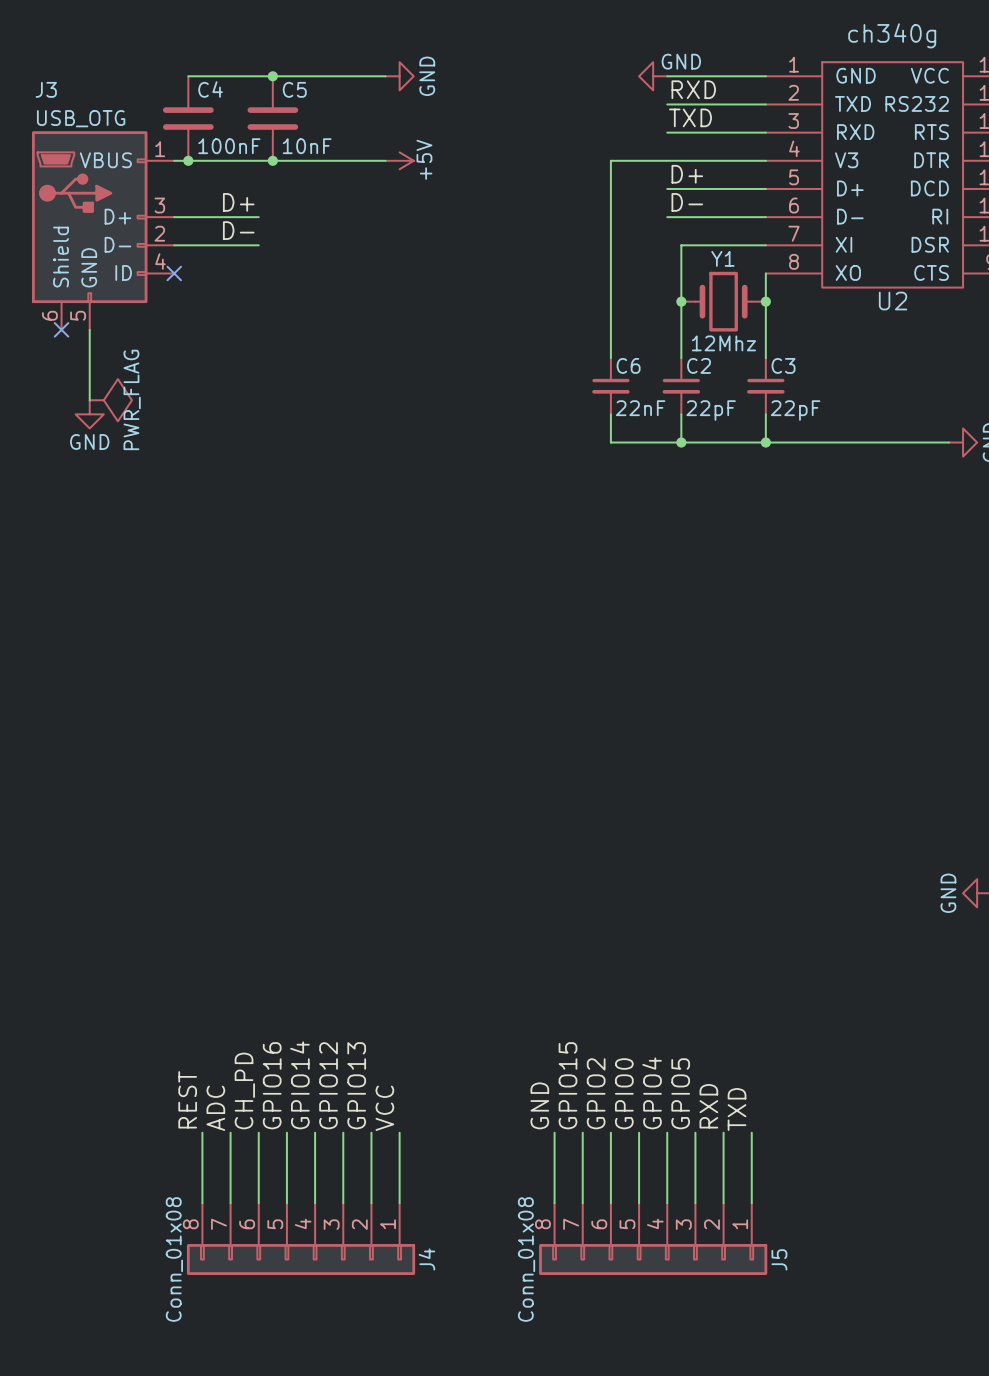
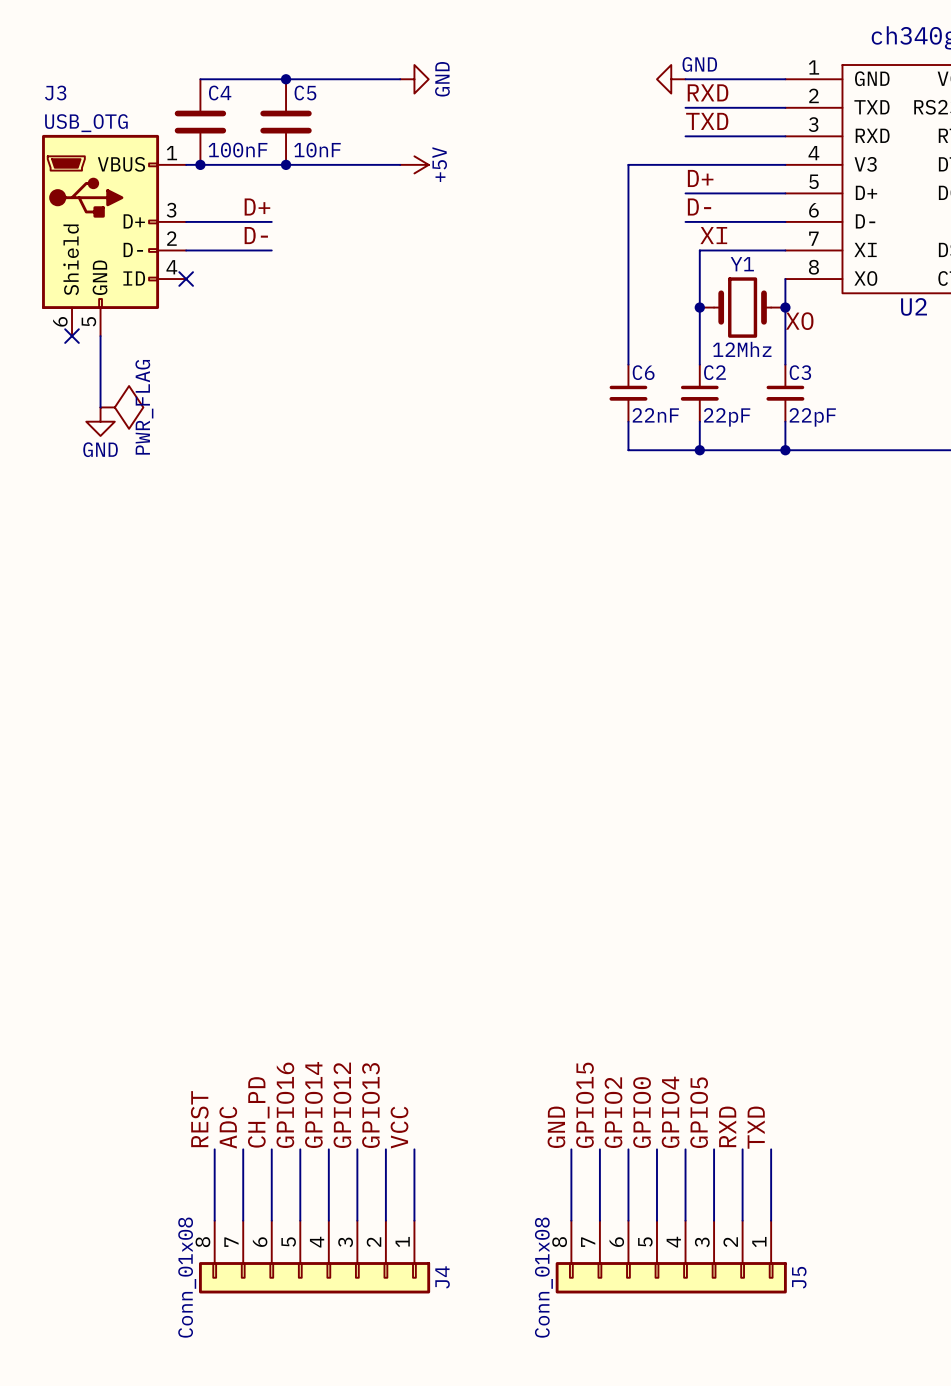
label: none -> XI (713, 235)
label: none -> XO (799, 321)

